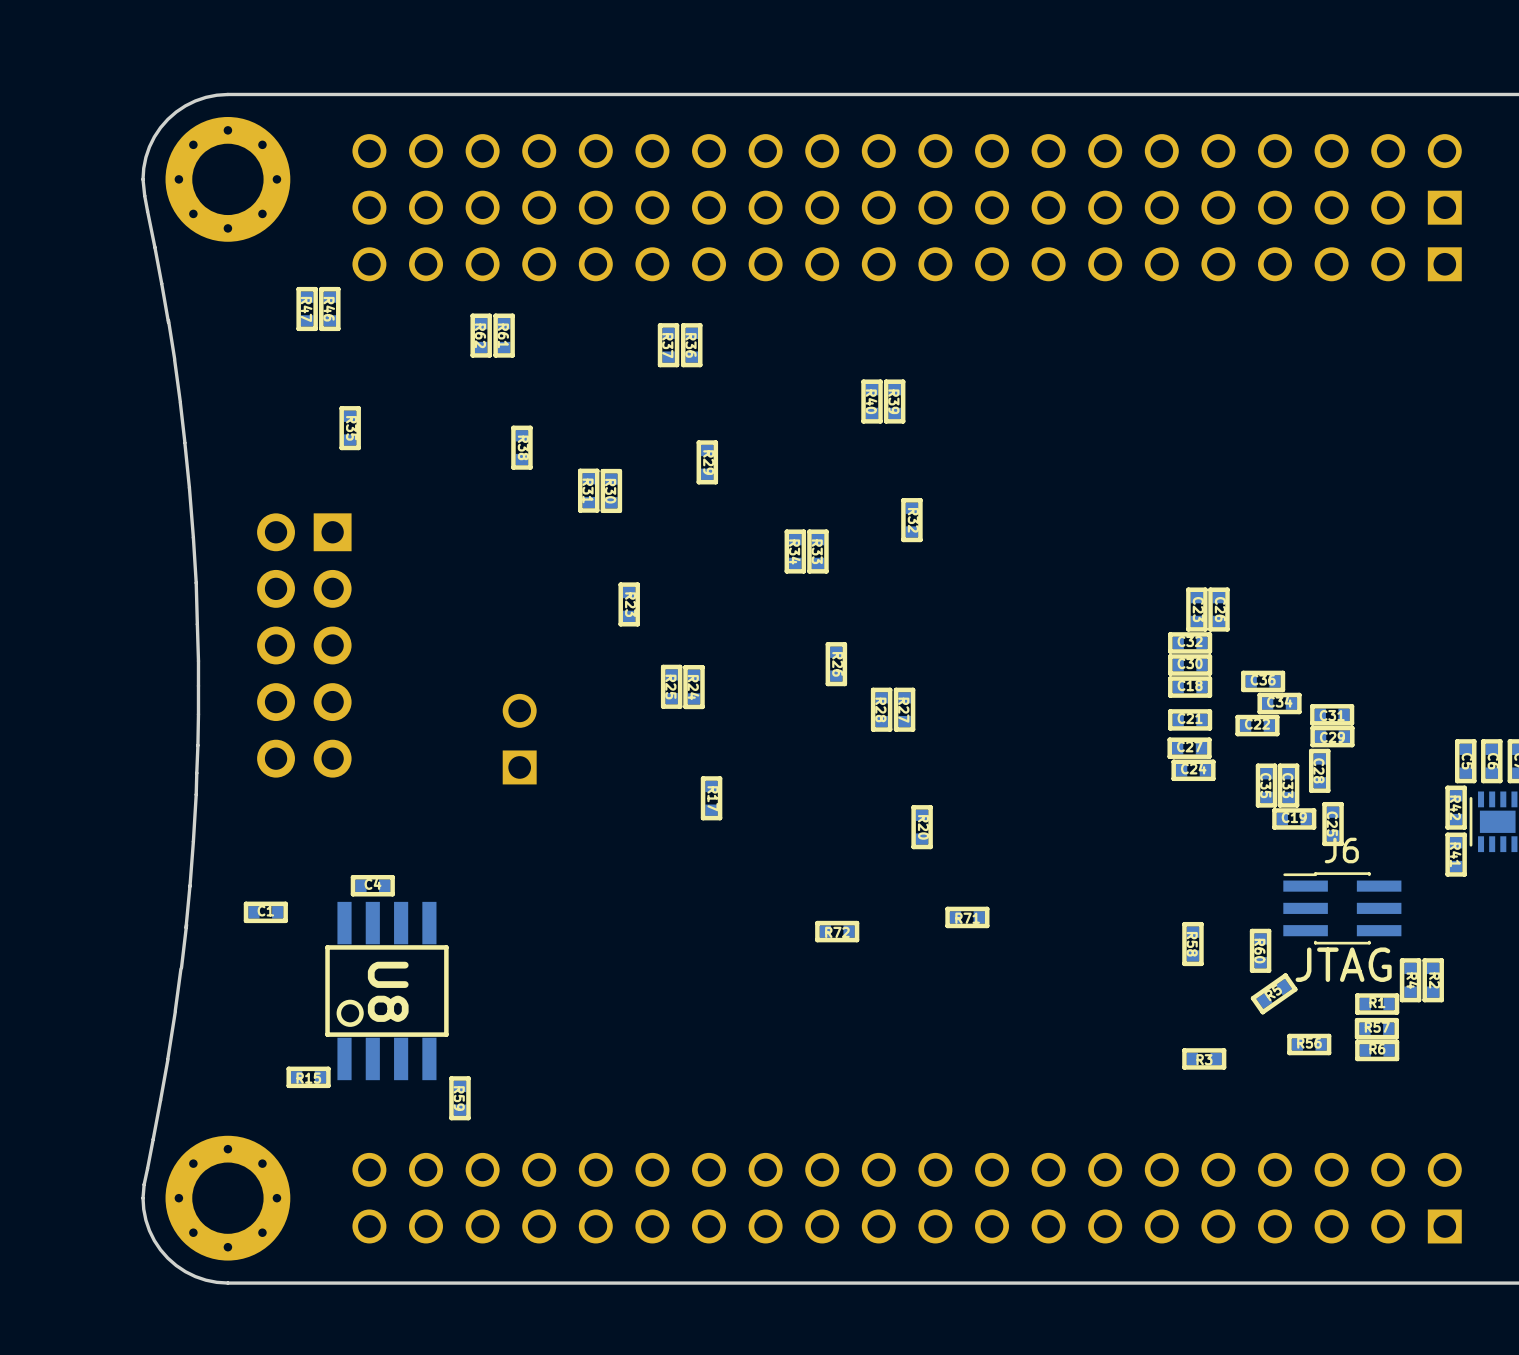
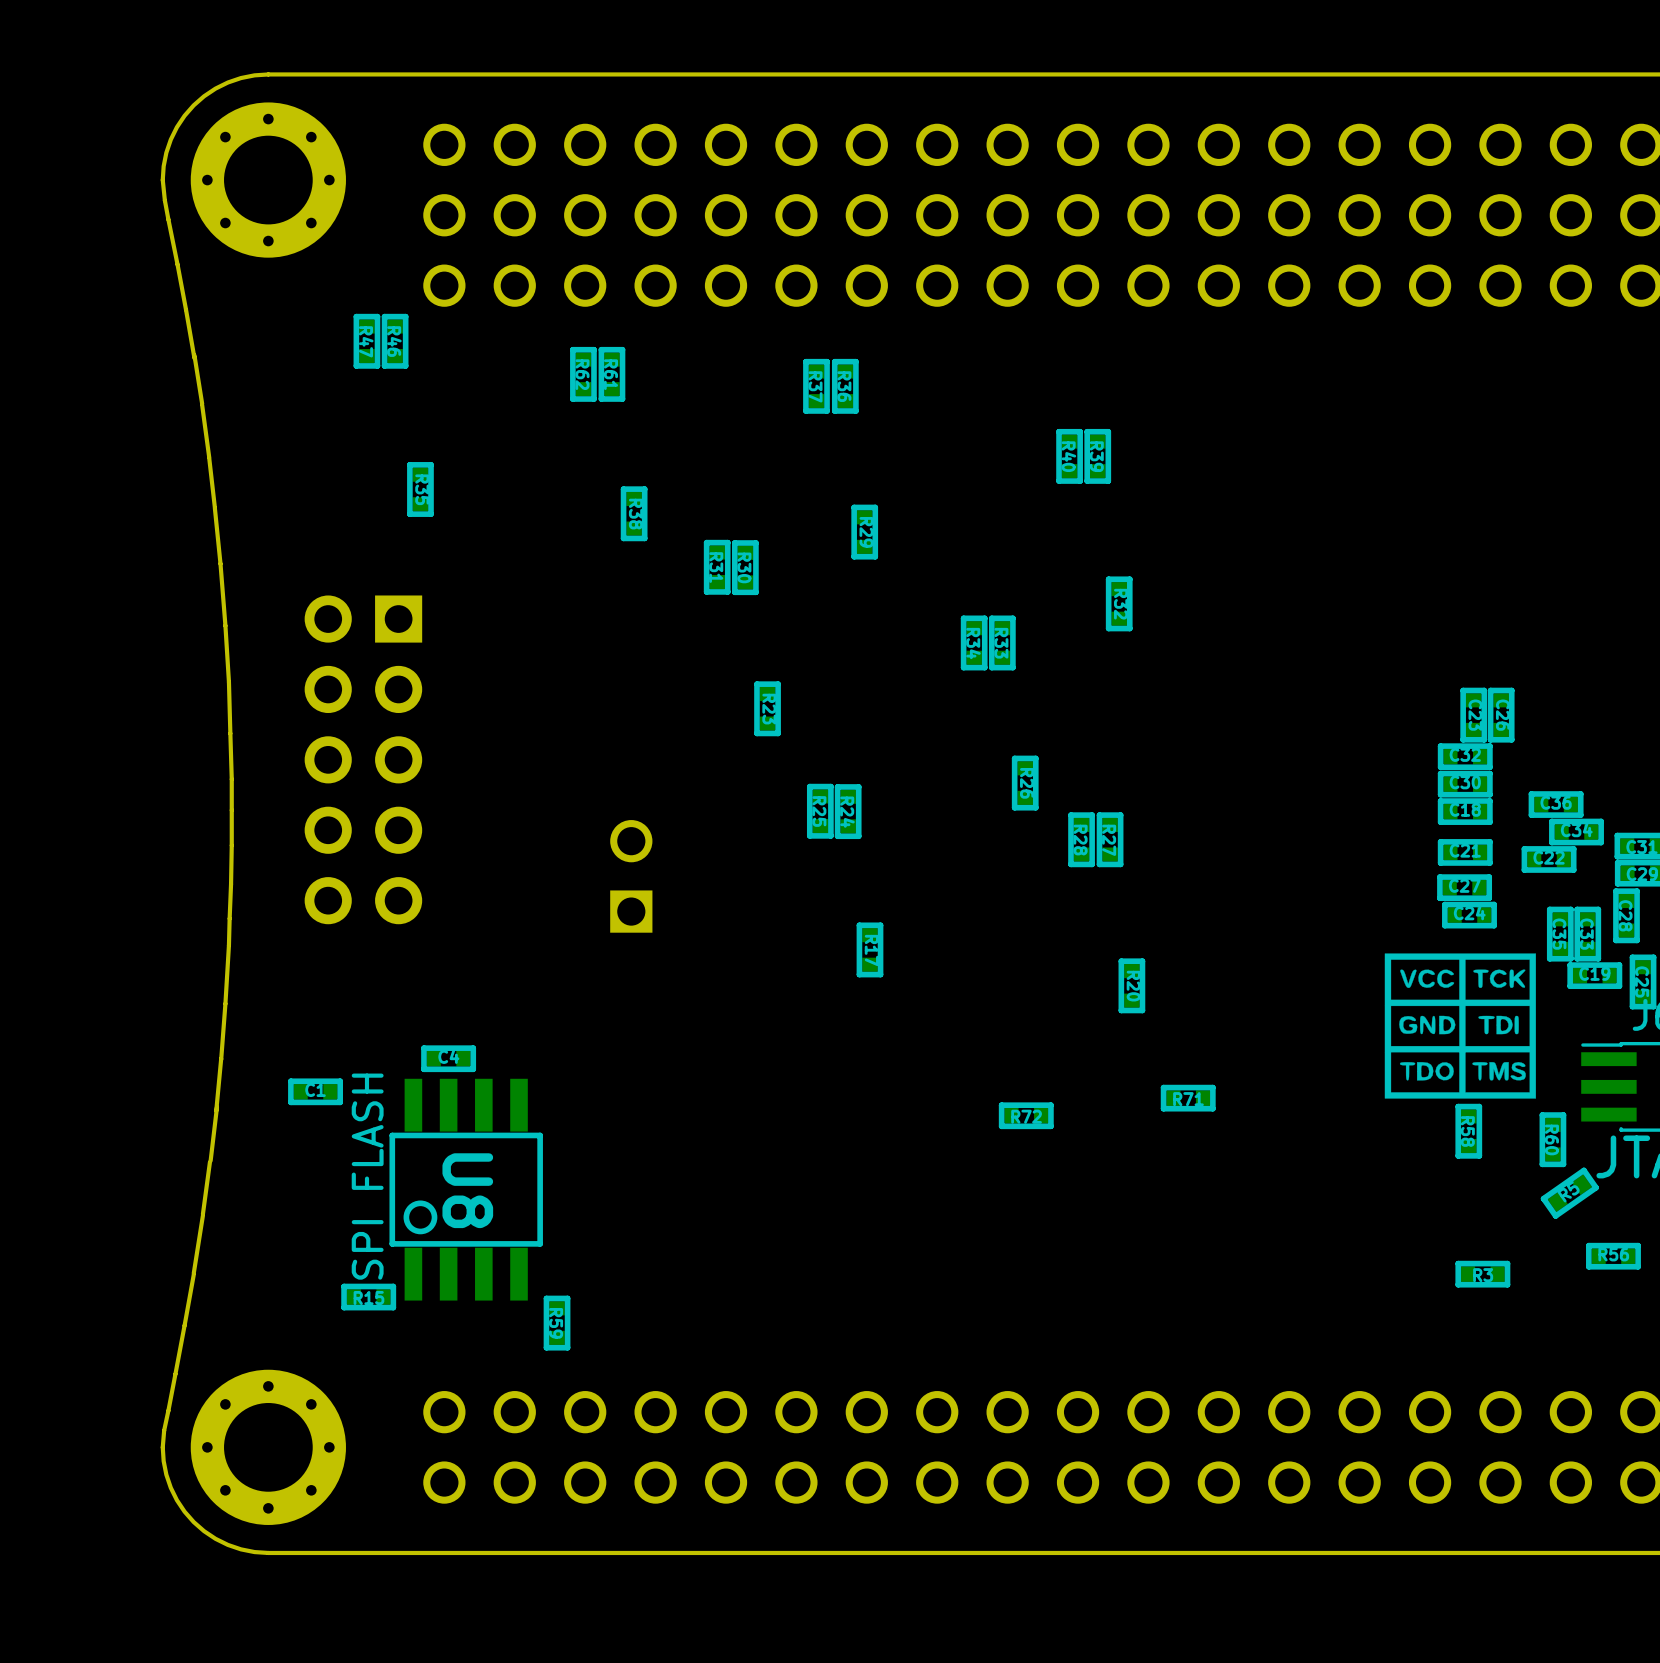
drawing: none -> [1384, 953, 1536, 1099]
text: none -> SPI FLASH (367, 1176)

